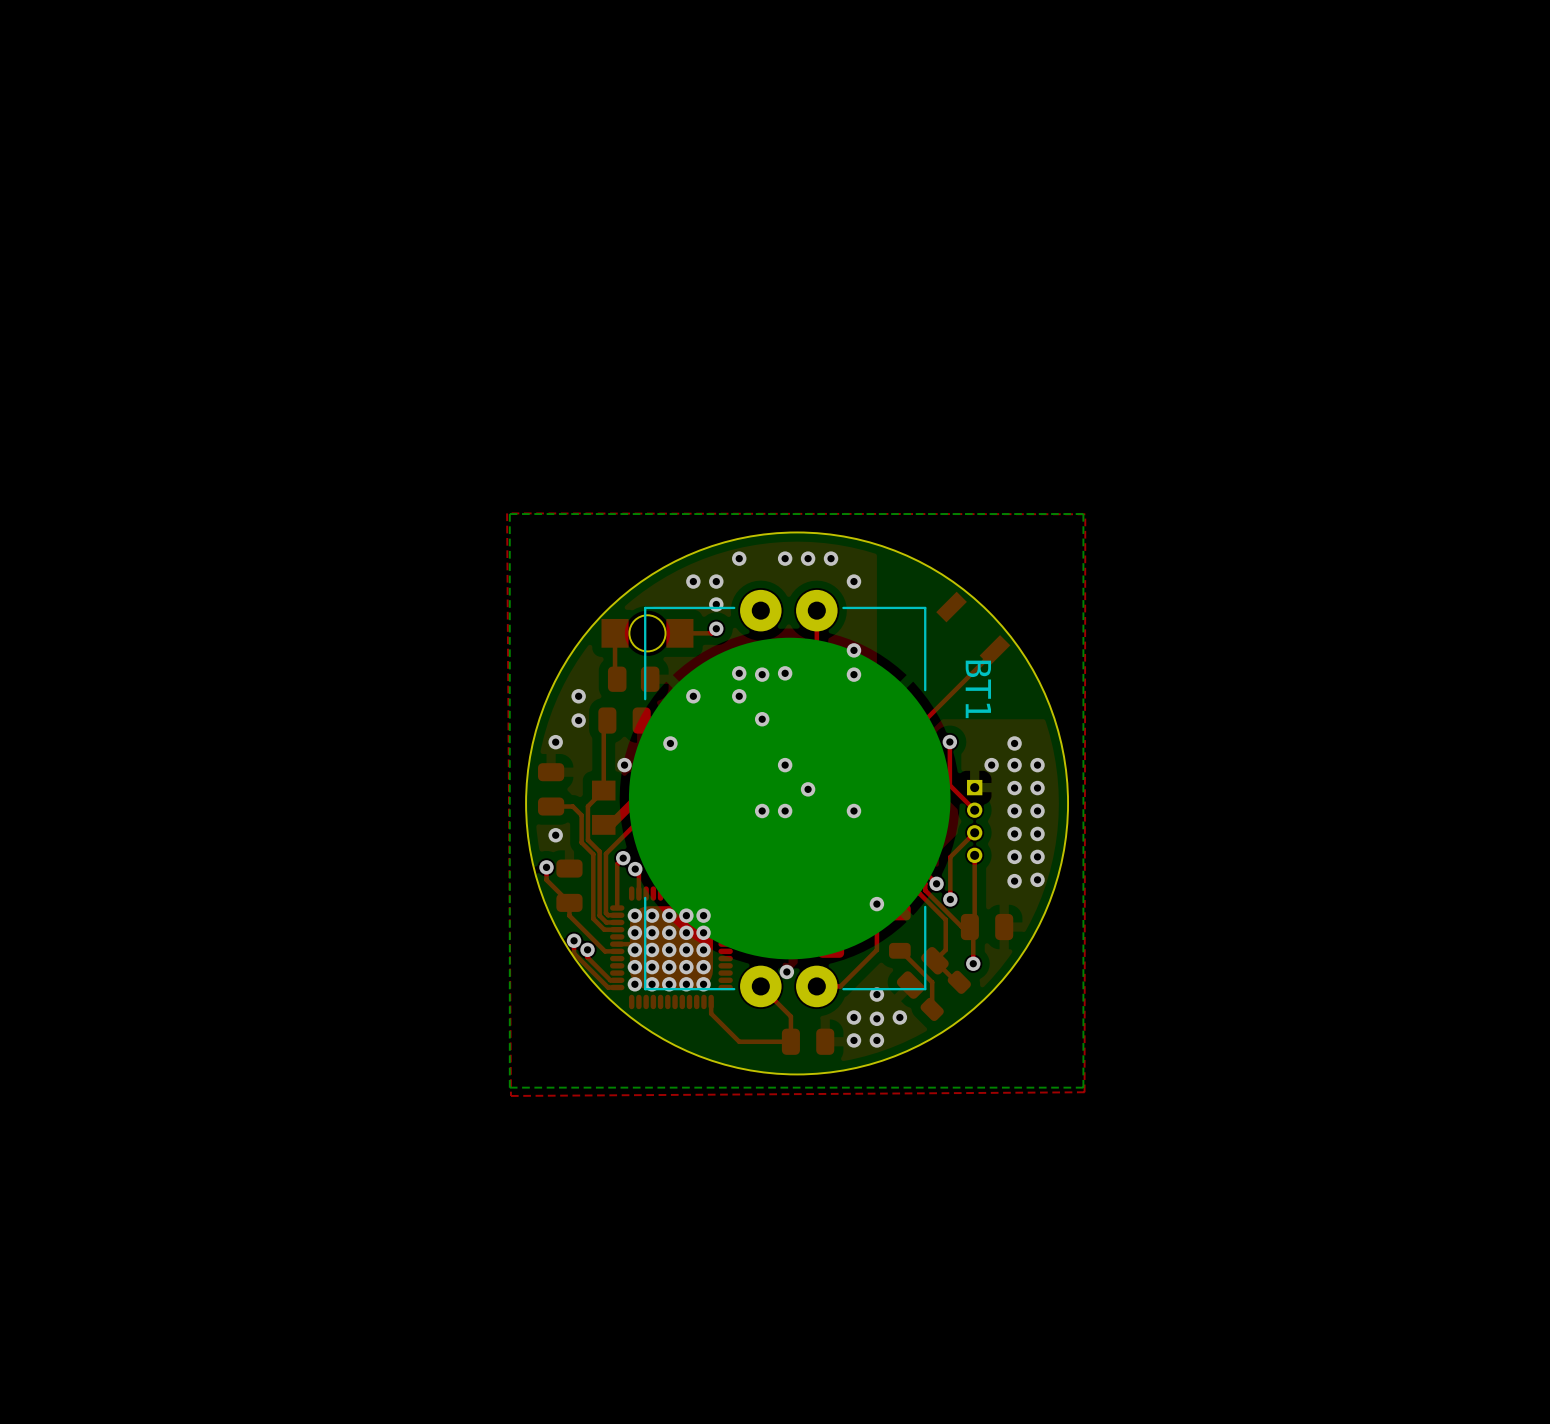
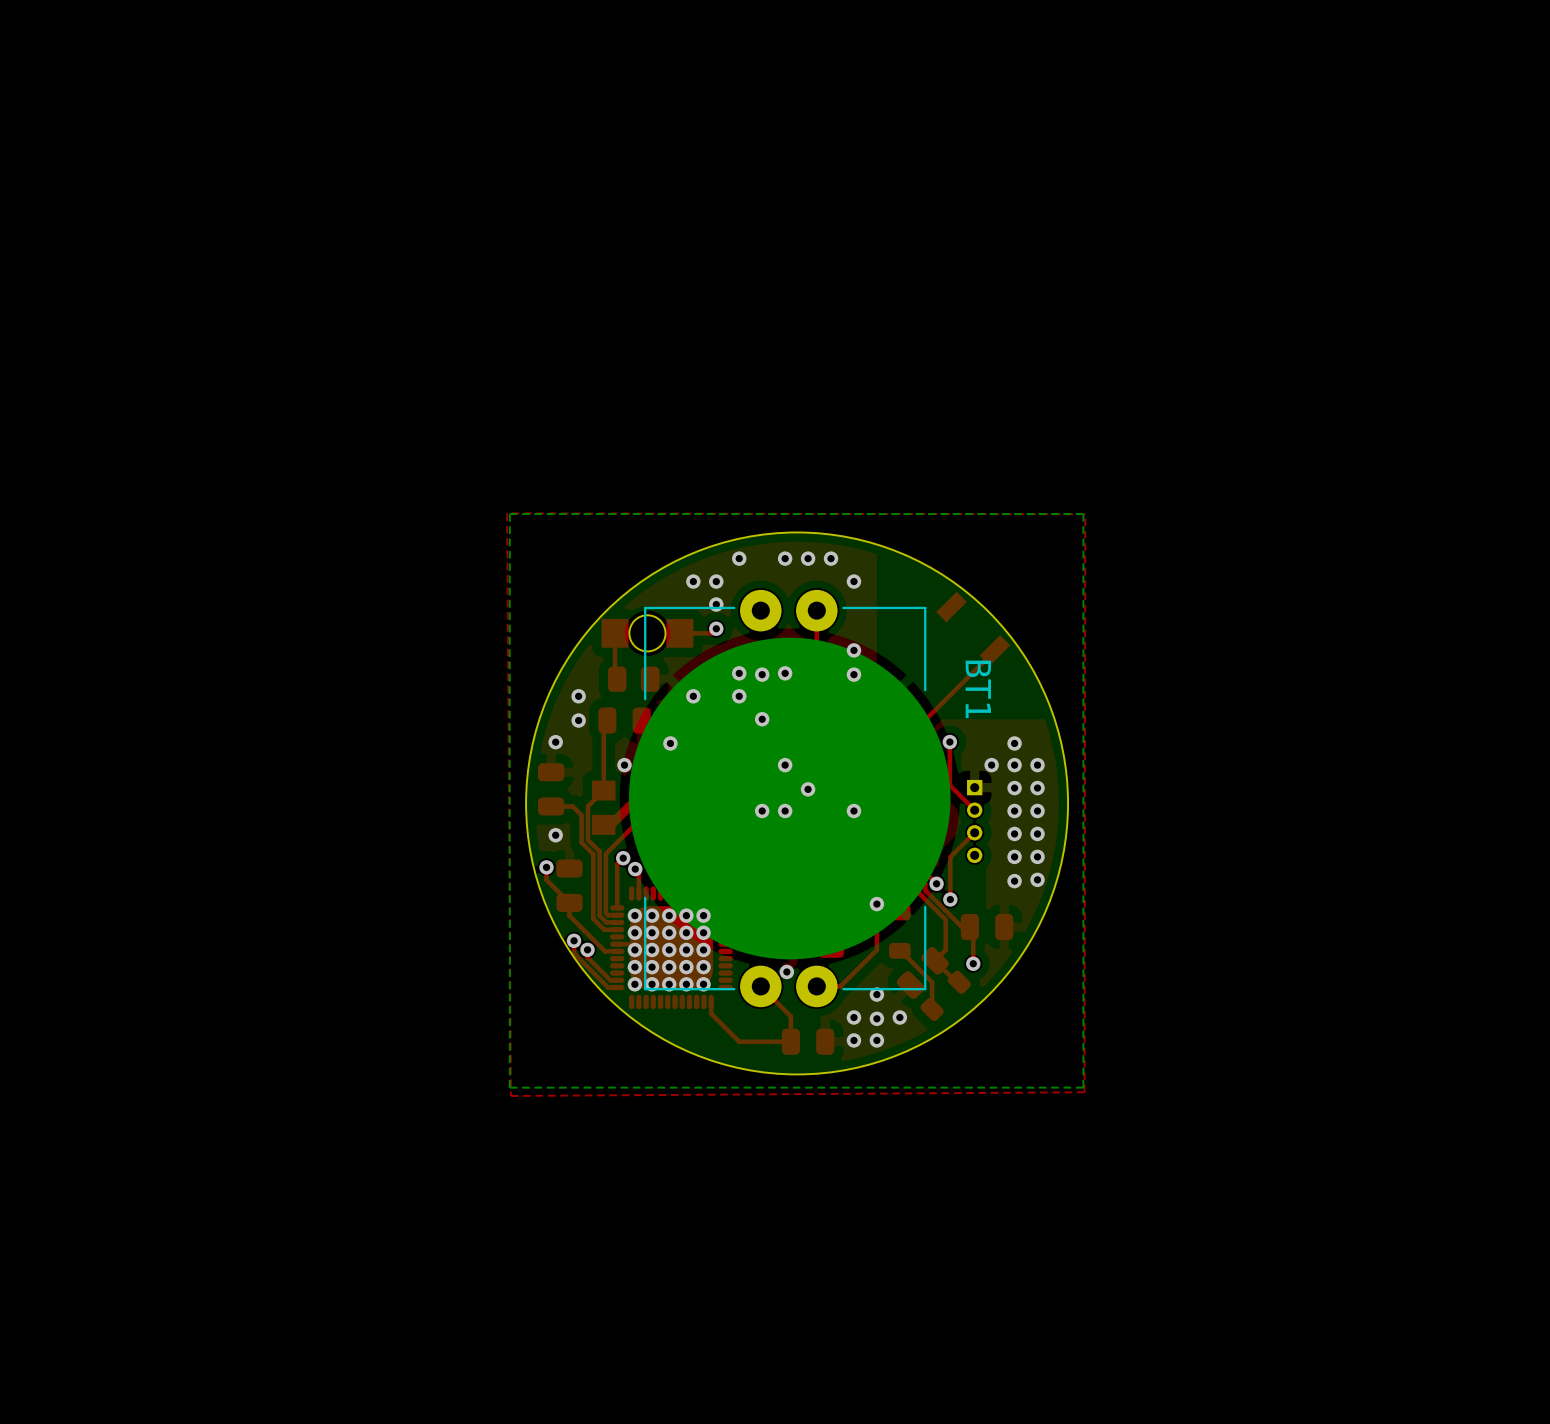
top track: (974, 855) (974, 922) -> none

